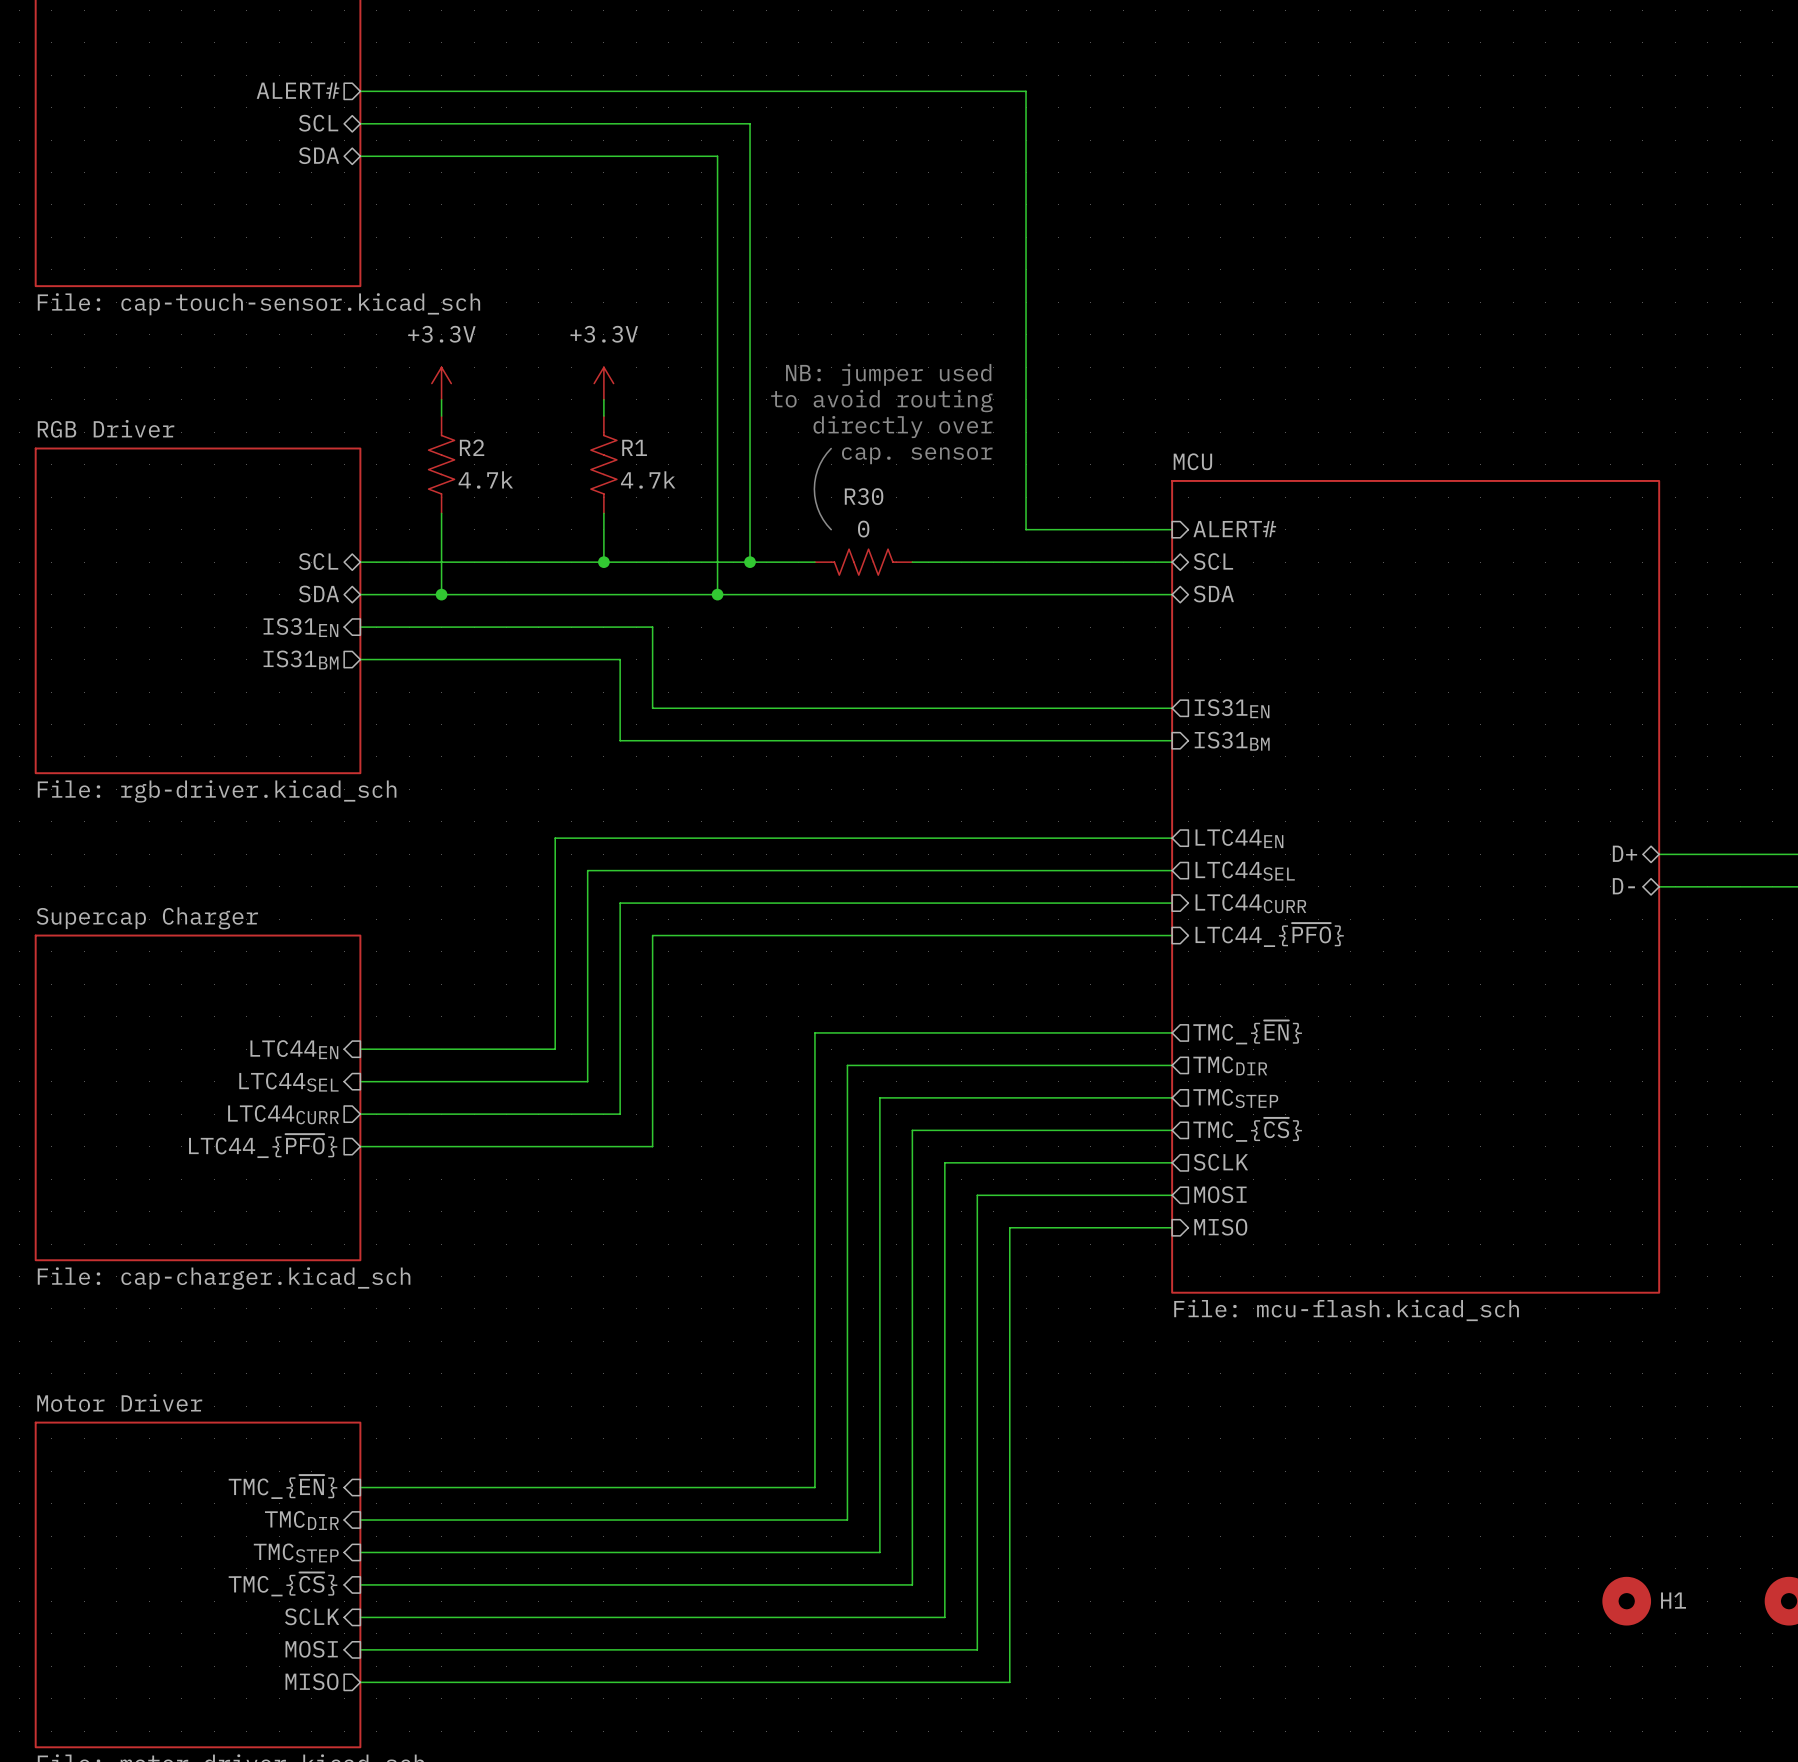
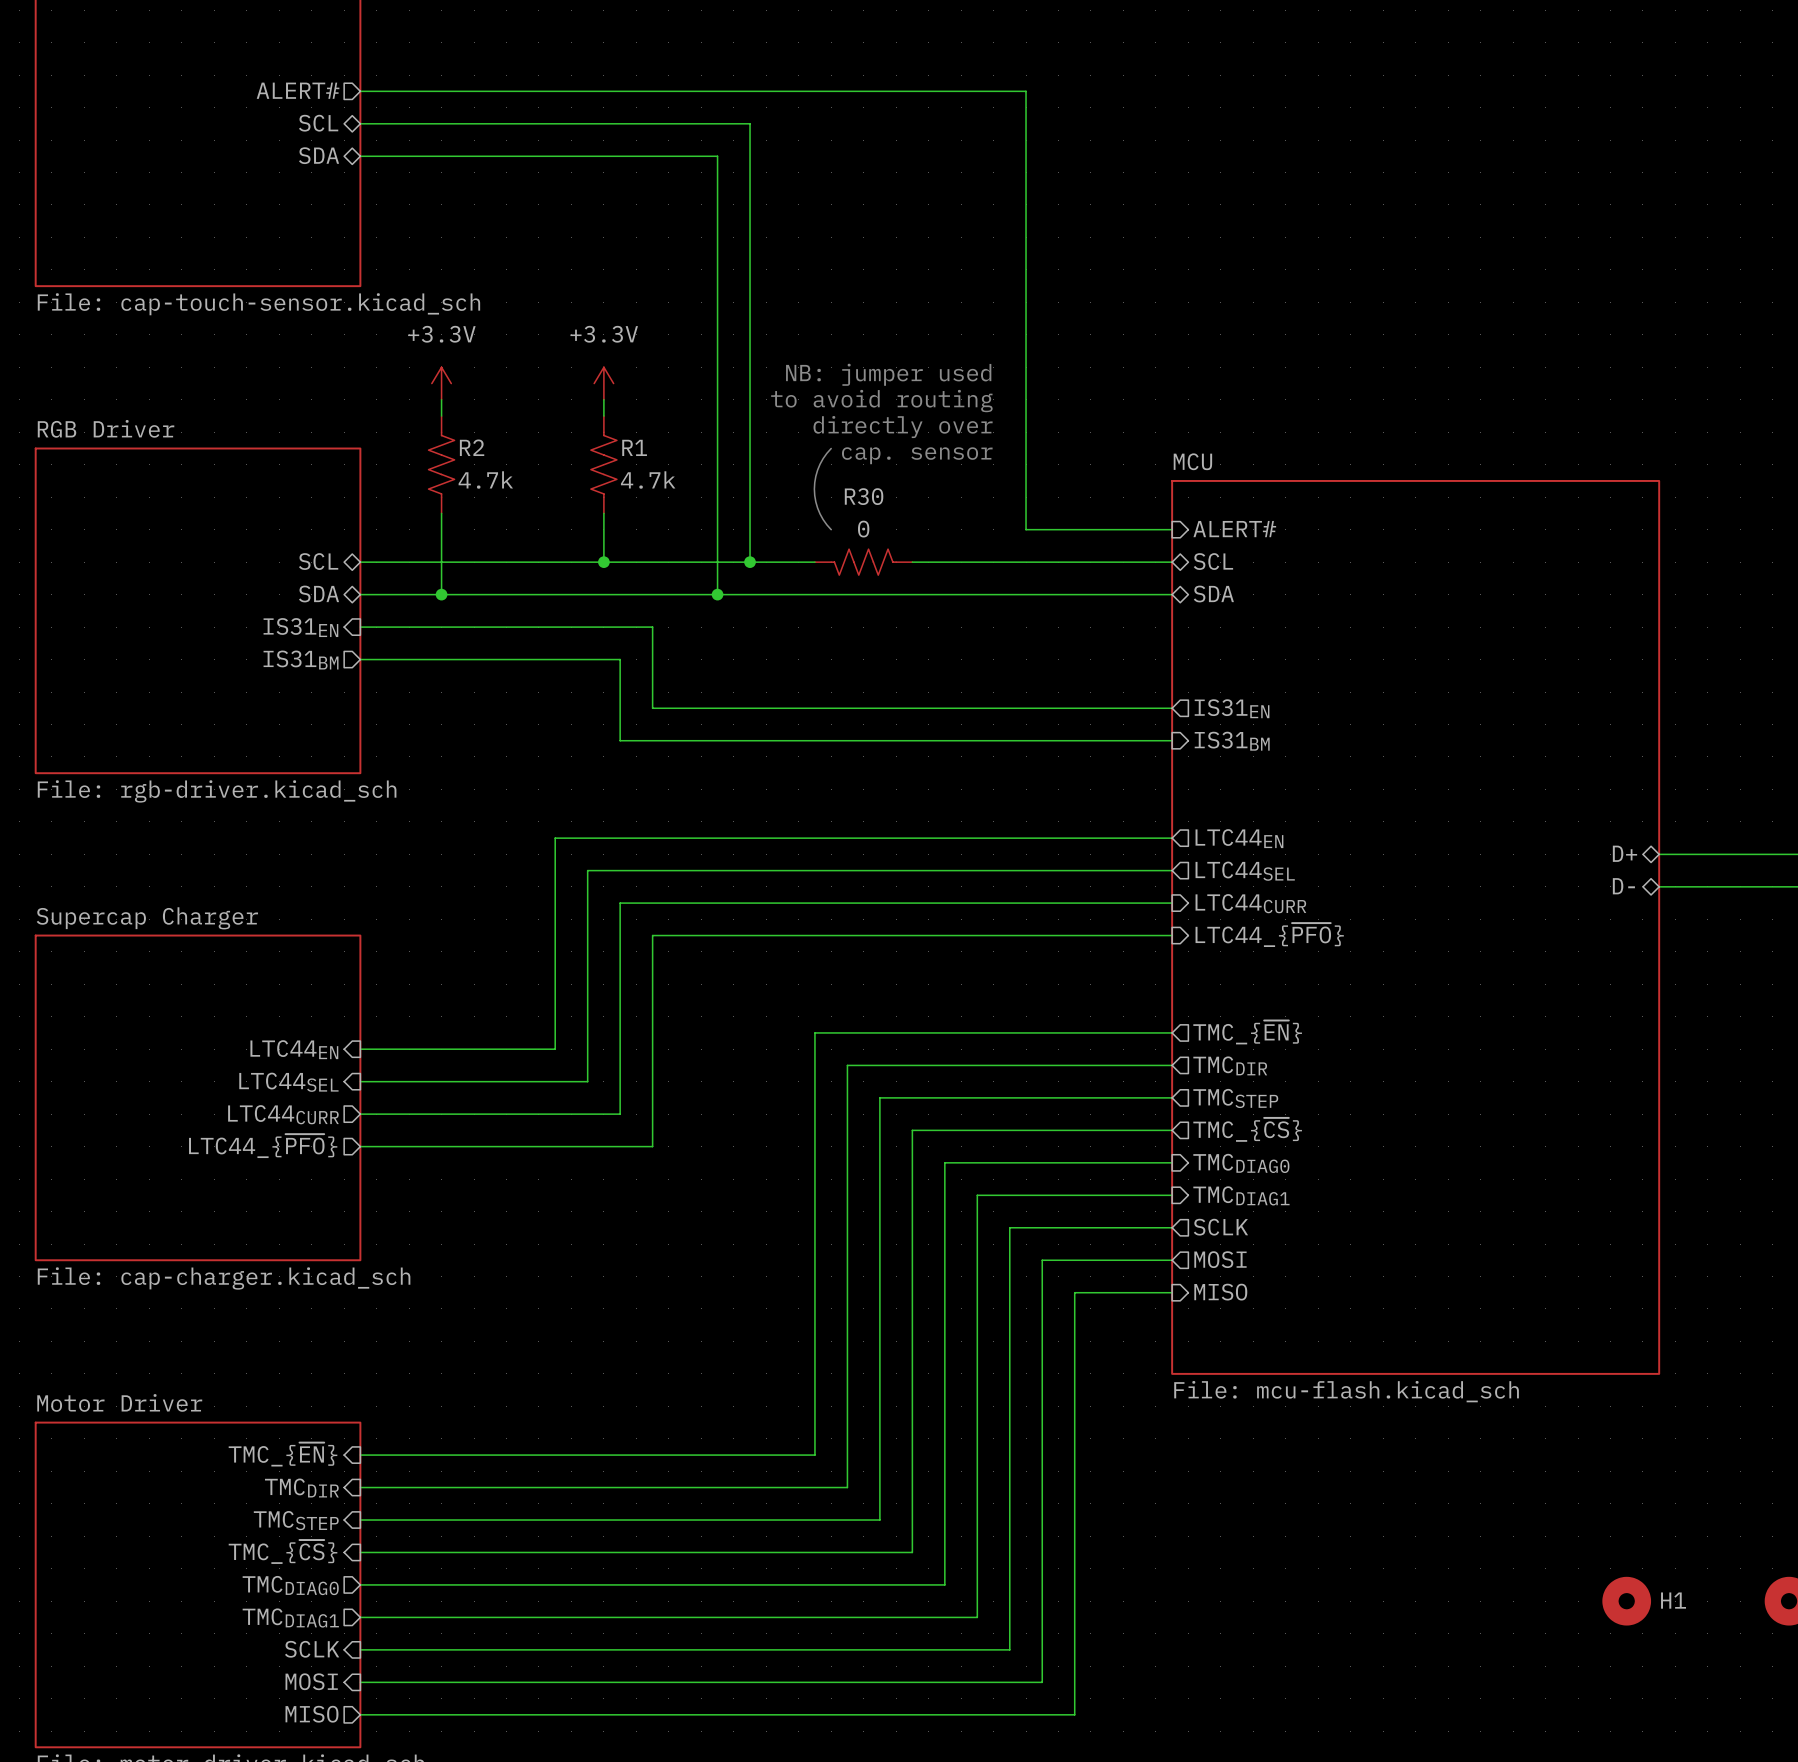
sheet MCU: File: mcu-flash.kicad_sch (1415, 886) -> none
sheet MCU: none -> File: mcu-flash.kicad_sch (1415, 927)
sheet pin shape: output (1220, 1162) -> input (1241, 1163)
sheet pin: SCLK (1220, 1162) -> TMCDIAG0 (1241, 1163)
sheet pin shape: output (1220, 1194) -> input (1241, 1195)
sheet pin: MOSI (1220, 1194) -> TMCDIAG1 (1241, 1195)
sheet pin shape: input (1220, 1227) -> output (1220, 1227)
sheet pin: MISO (1220, 1227) -> SCLK (1220, 1227)
sheet pin: none -> MOSI (1220, 1259)
wire: none -> (1172, 1292) (1074, 1292) (1074, 1714) (360, 1714)
sheet pin: none -> MISO (1220, 1292)
sheet pin: none -> TMC_{~{EN}} (283, 1454)
wire: none -> (360, 1455) (814, 1455)
wire: (814, 1455) (814, 1487) -> (847, 1487) (814, 1487)
sheet pin: TMC_{~{EN}} (283, 1487) -> TMCDIR (301, 1488)
wire: (847, 1487) (847, 1520) -> (879, 1520) (847, 1520)
sheet pin: TMCDIR (301, 1520) -> TMCSTEP (296, 1520)
wire: (879, 1520) (879, 1552) -> (912, 1552) (879, 1552)
wire: (912, 1552) (912, 1584) -> (944, 1584) (912, 1584)
sheet pin: TMCSTEP (296, 1553) -> TMC_{~{CS}} (283, 1551)
sheet pin shape: input (283, 1584) -> output (290, 1585)
sheet pin: TMC_{~{CS}} (283, 1584) -> TMCDIAG0 (290, 1585)
wire: (944, 1584) (944, 1617) -> (977, 1617) (944, 1617)
sheet pin shape: input (312, 1616) -> output (290, 1618)
sheet pin: SCLK (312, 1616) -> TMCDIAG1 (290, 1618)
wire: (977, 1617) (977, 1649) -> (1009, 1649) (977, 1649)
sheet pin: MOSI (311, 1649) -> SCLK (312, 1649)
wire: (1009, 1649) (1009, 1682) -> (1172, 1260) (1042, 1260) (1042, 1682) (1009, 1682)
sheet pin shape: output (311, 1681) -> input (311, 1681)
sheet pin: MISO (311, 1681) -> MOSI (311, 1681)
sheet pin: none -> MISO (311, 1714)

